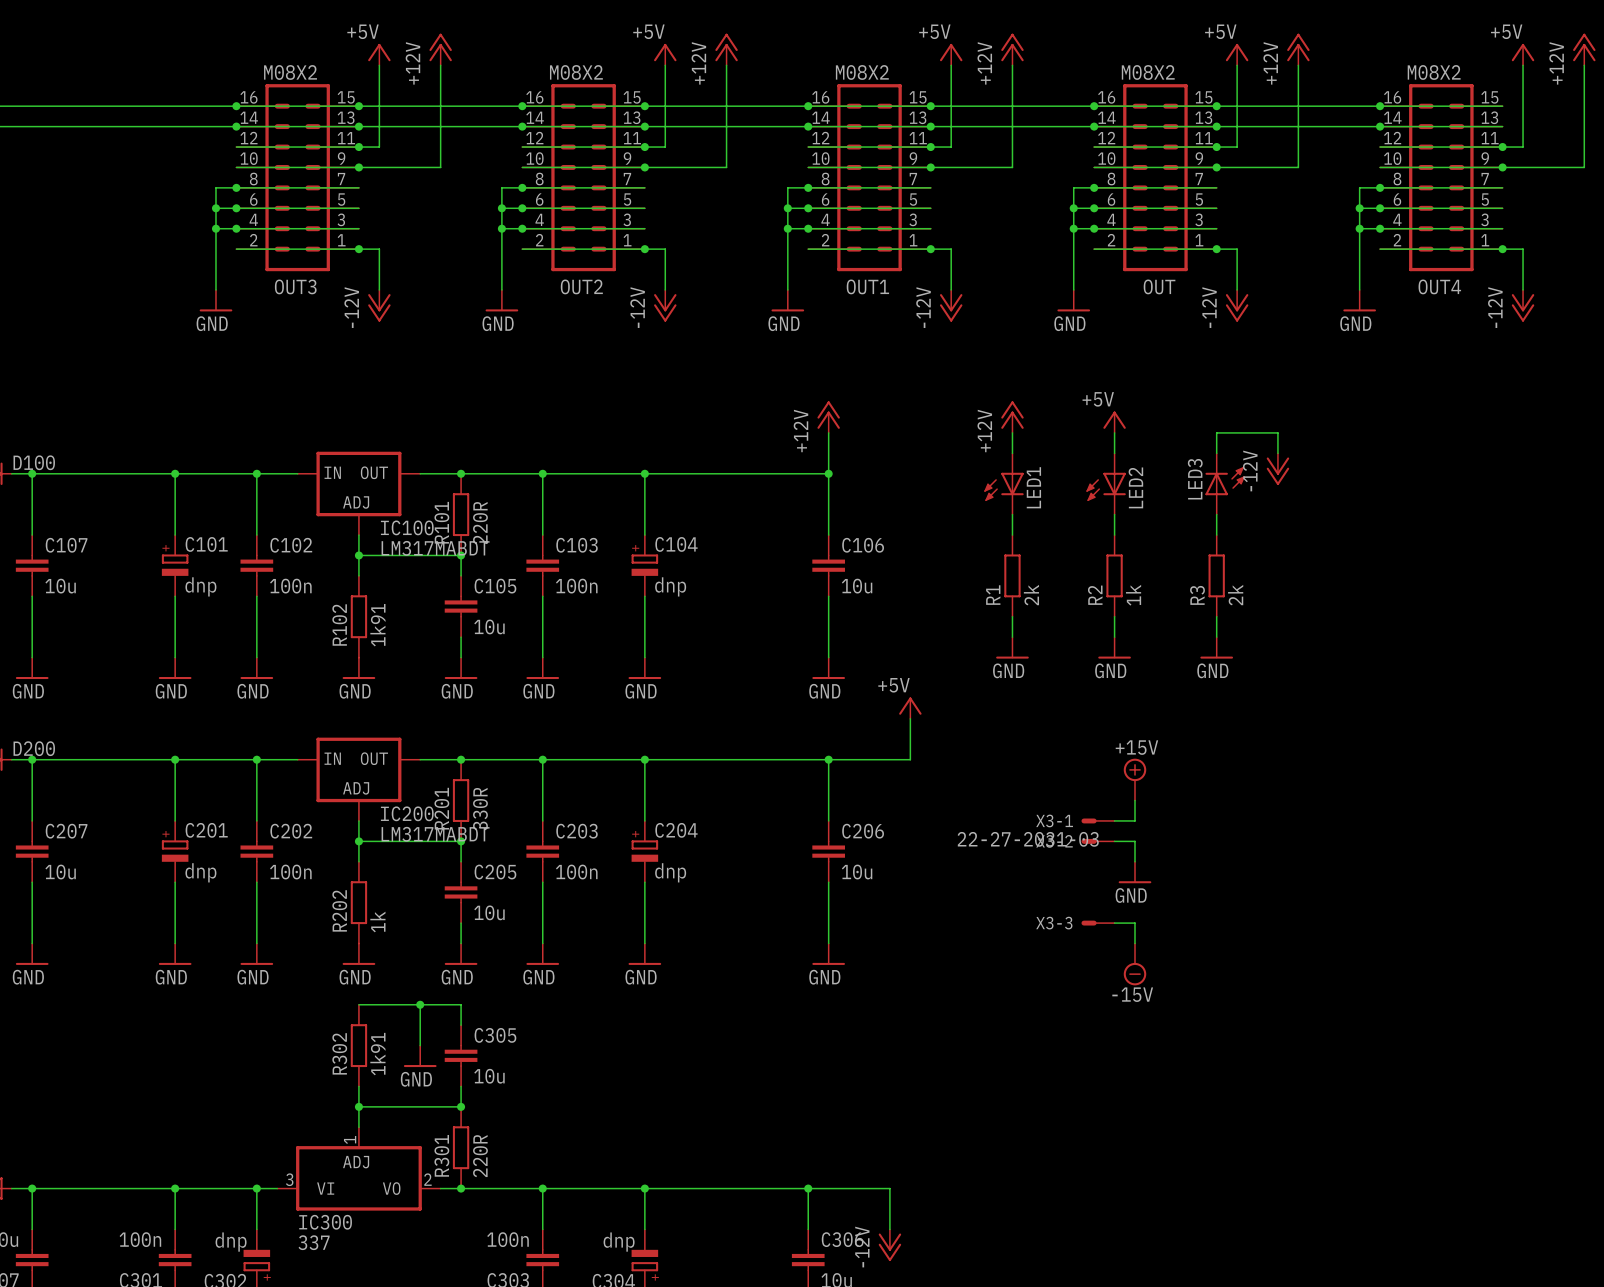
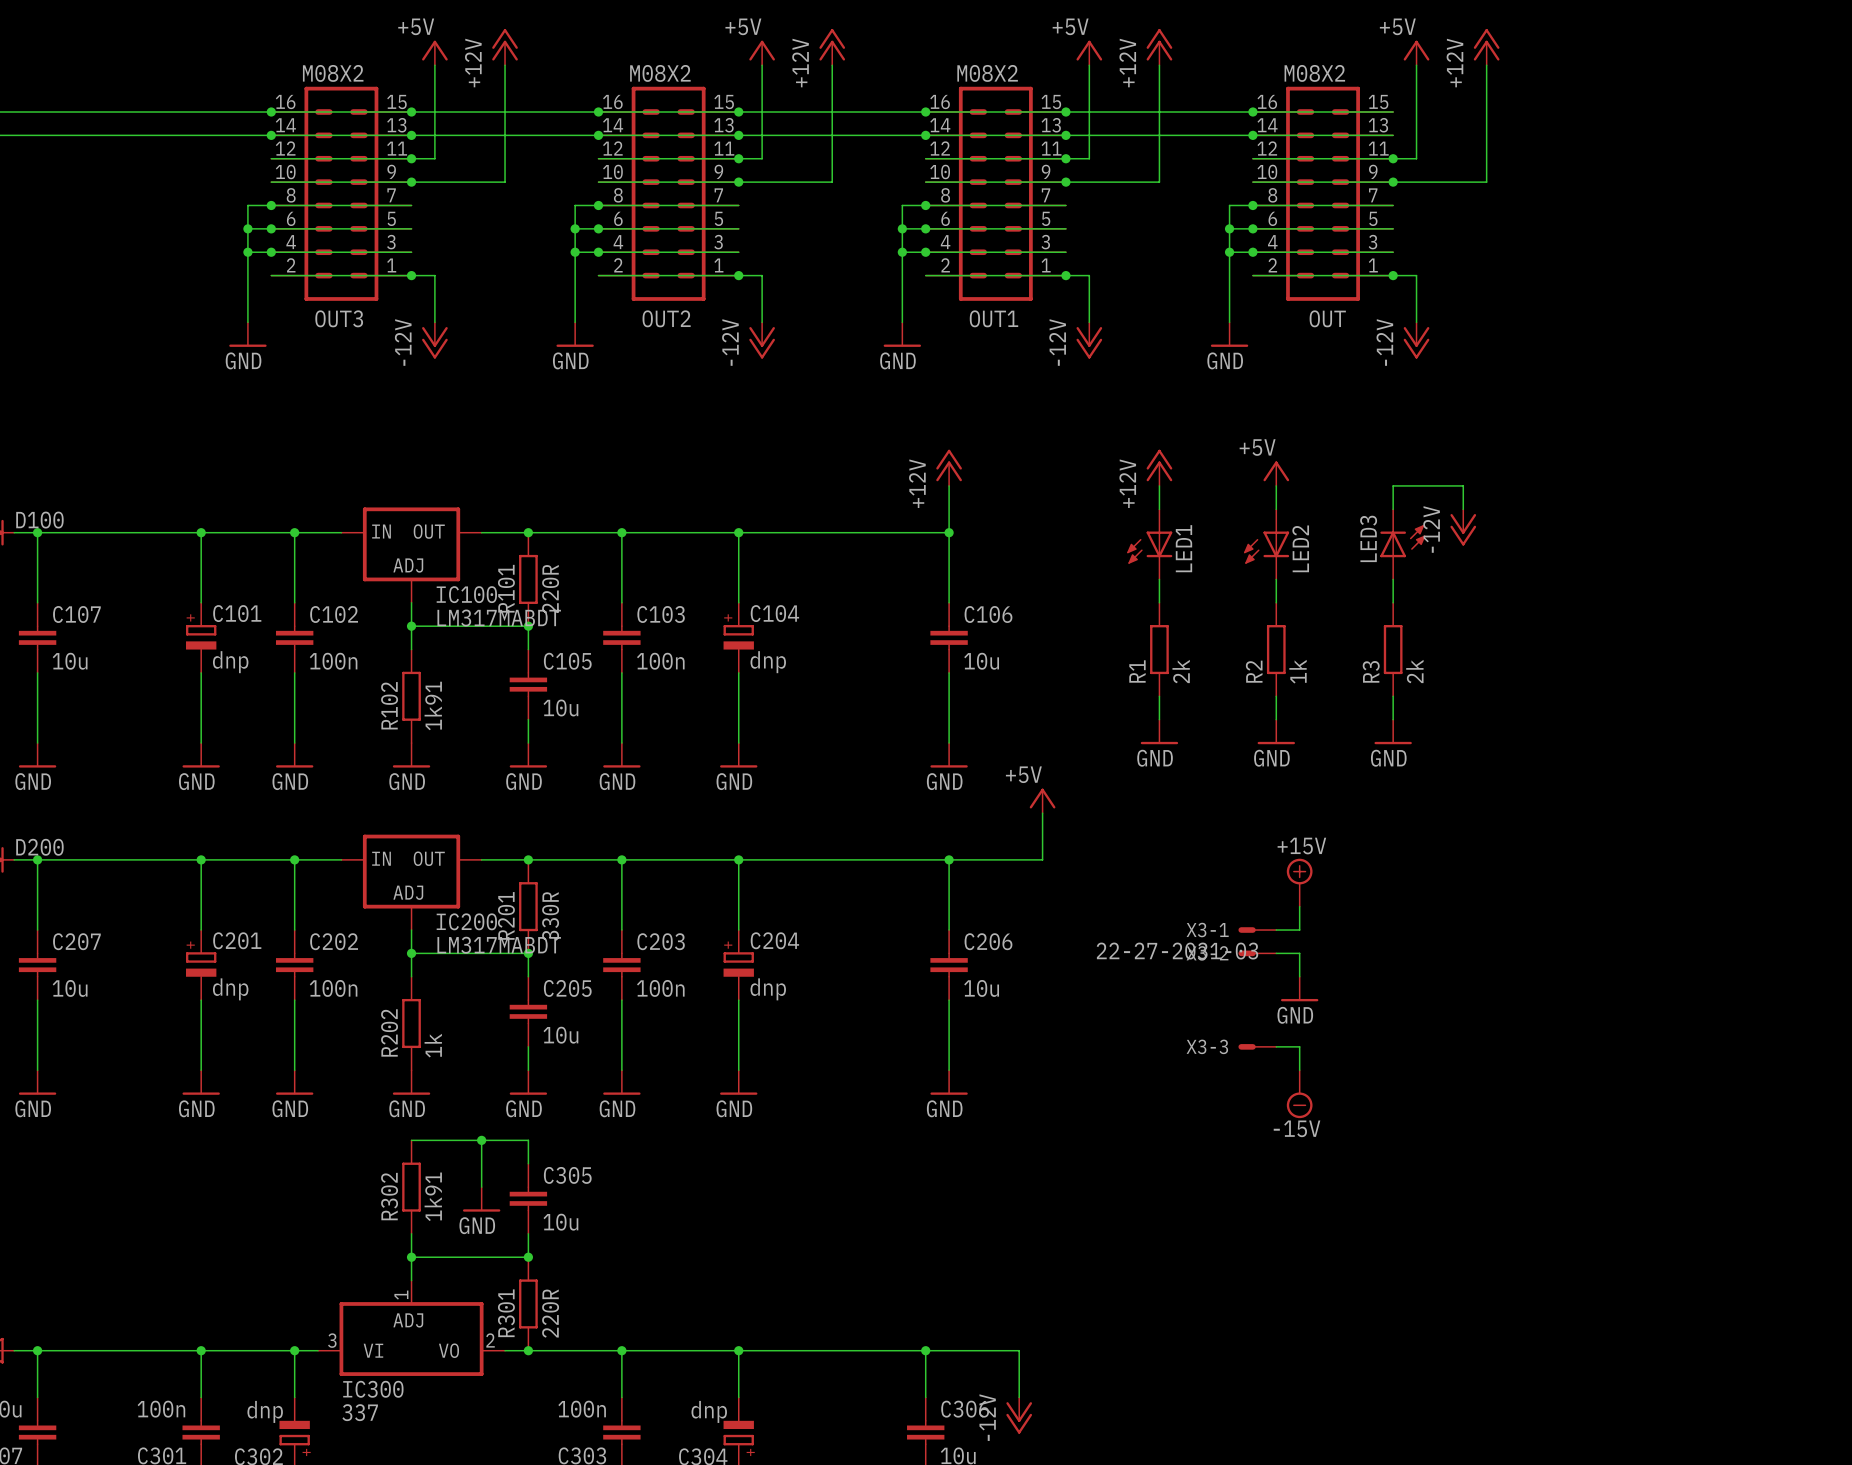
power symbol: +12V (1584, 49) -> none
power symbol: +5V (1523, 54) -> none
wire: (1523, 65) (1523, 147) (1380, 147) -> none
wire: (1584, 65) (1584, 167) (1380, 167) -> none
wire: (1216, 106) (1502, 106) -> none
junction: (1216, 106) -> none
junction: (1380, 106) -> none
wire: (1216, 126) (1502, 126) -> none
junction: (1216, 126) -> none
junction: (1380, 126) -> none
junction: (1502, 147) -> none
junction: (1502, 167) -> none
OUT4: M08X2 (1441, 177) -> none
junction: (1380, 187) -> none
wire: (1502, 187) (1359, 187) (1359, 289) -> none
wire: (1359, 208) (1502, 208) -> none
junction: (1359, 208) -> none
junction: (1380, 208) -> none
wire: (1359, 228) (1502, 228) -> none
junction: (1359, 228) -> none
junction: (1380, 228) -> none
wire: (1380, 249) (1523, 249) (1523, 289) -> none
junction: (1502, 249) -> none
power symbol: GND (1359, 300) -> none
power symbol: -12V (1523, 305) -> none

